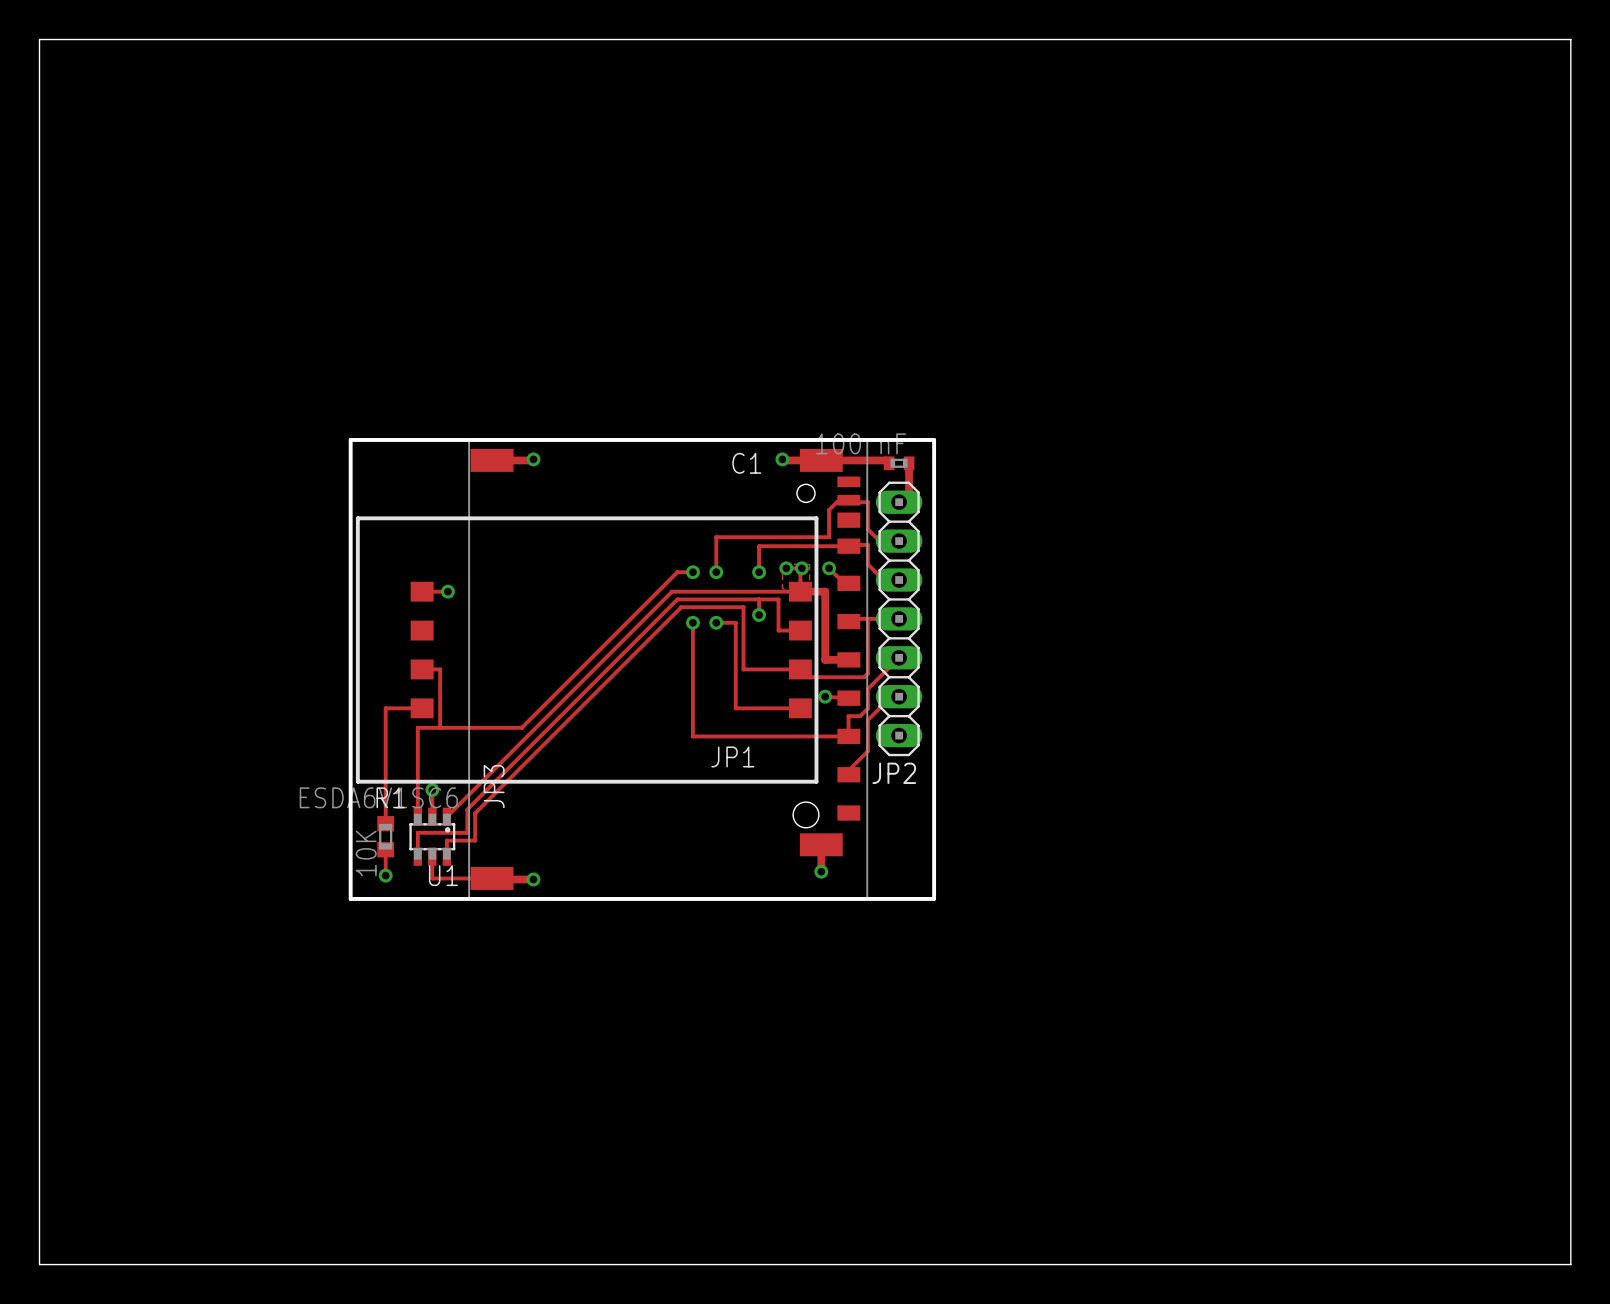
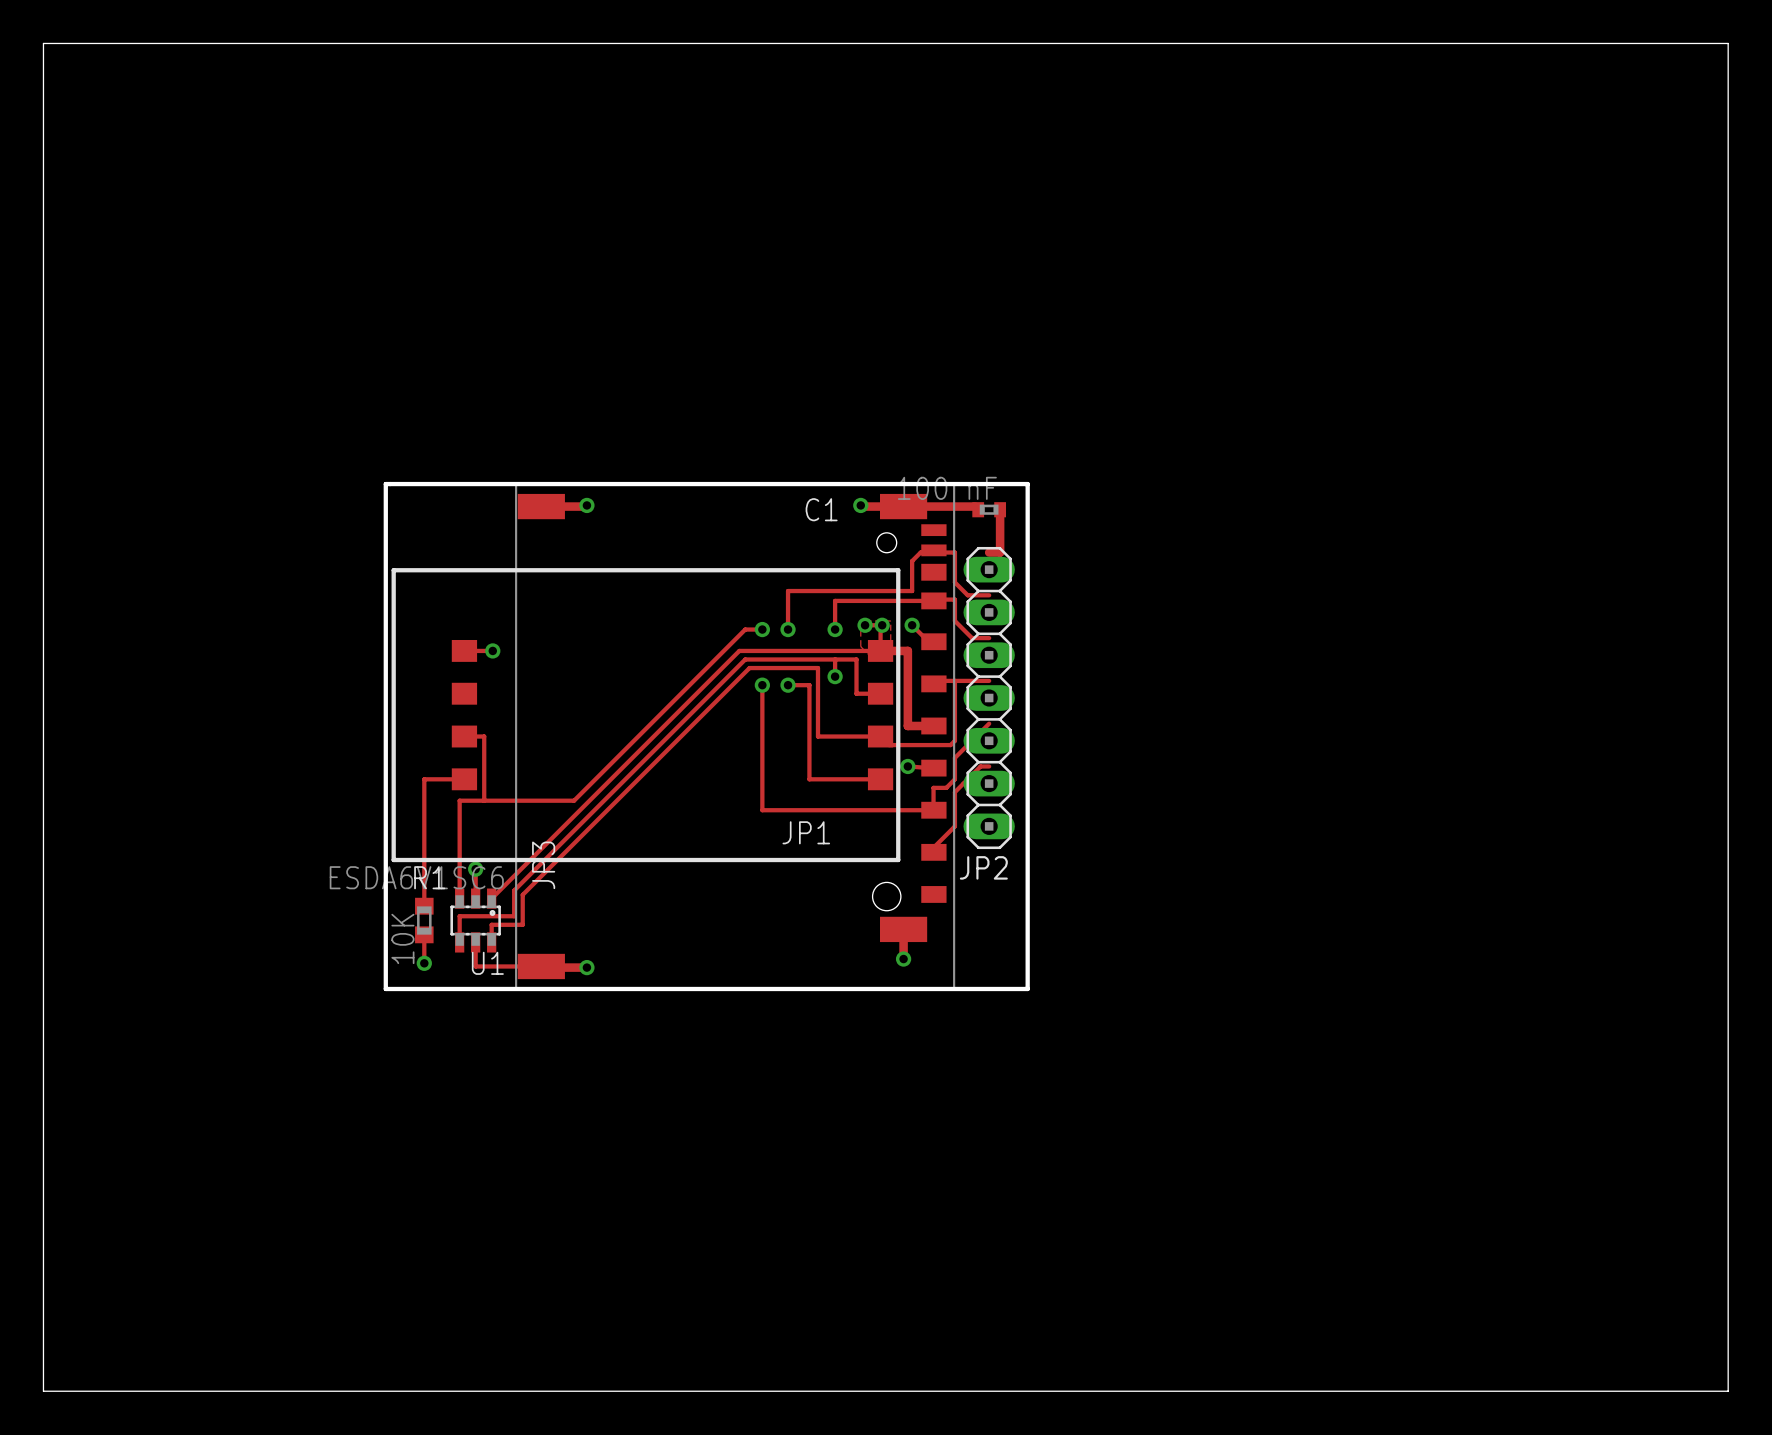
JP2 position: (899, 618) -> (989, 698)

